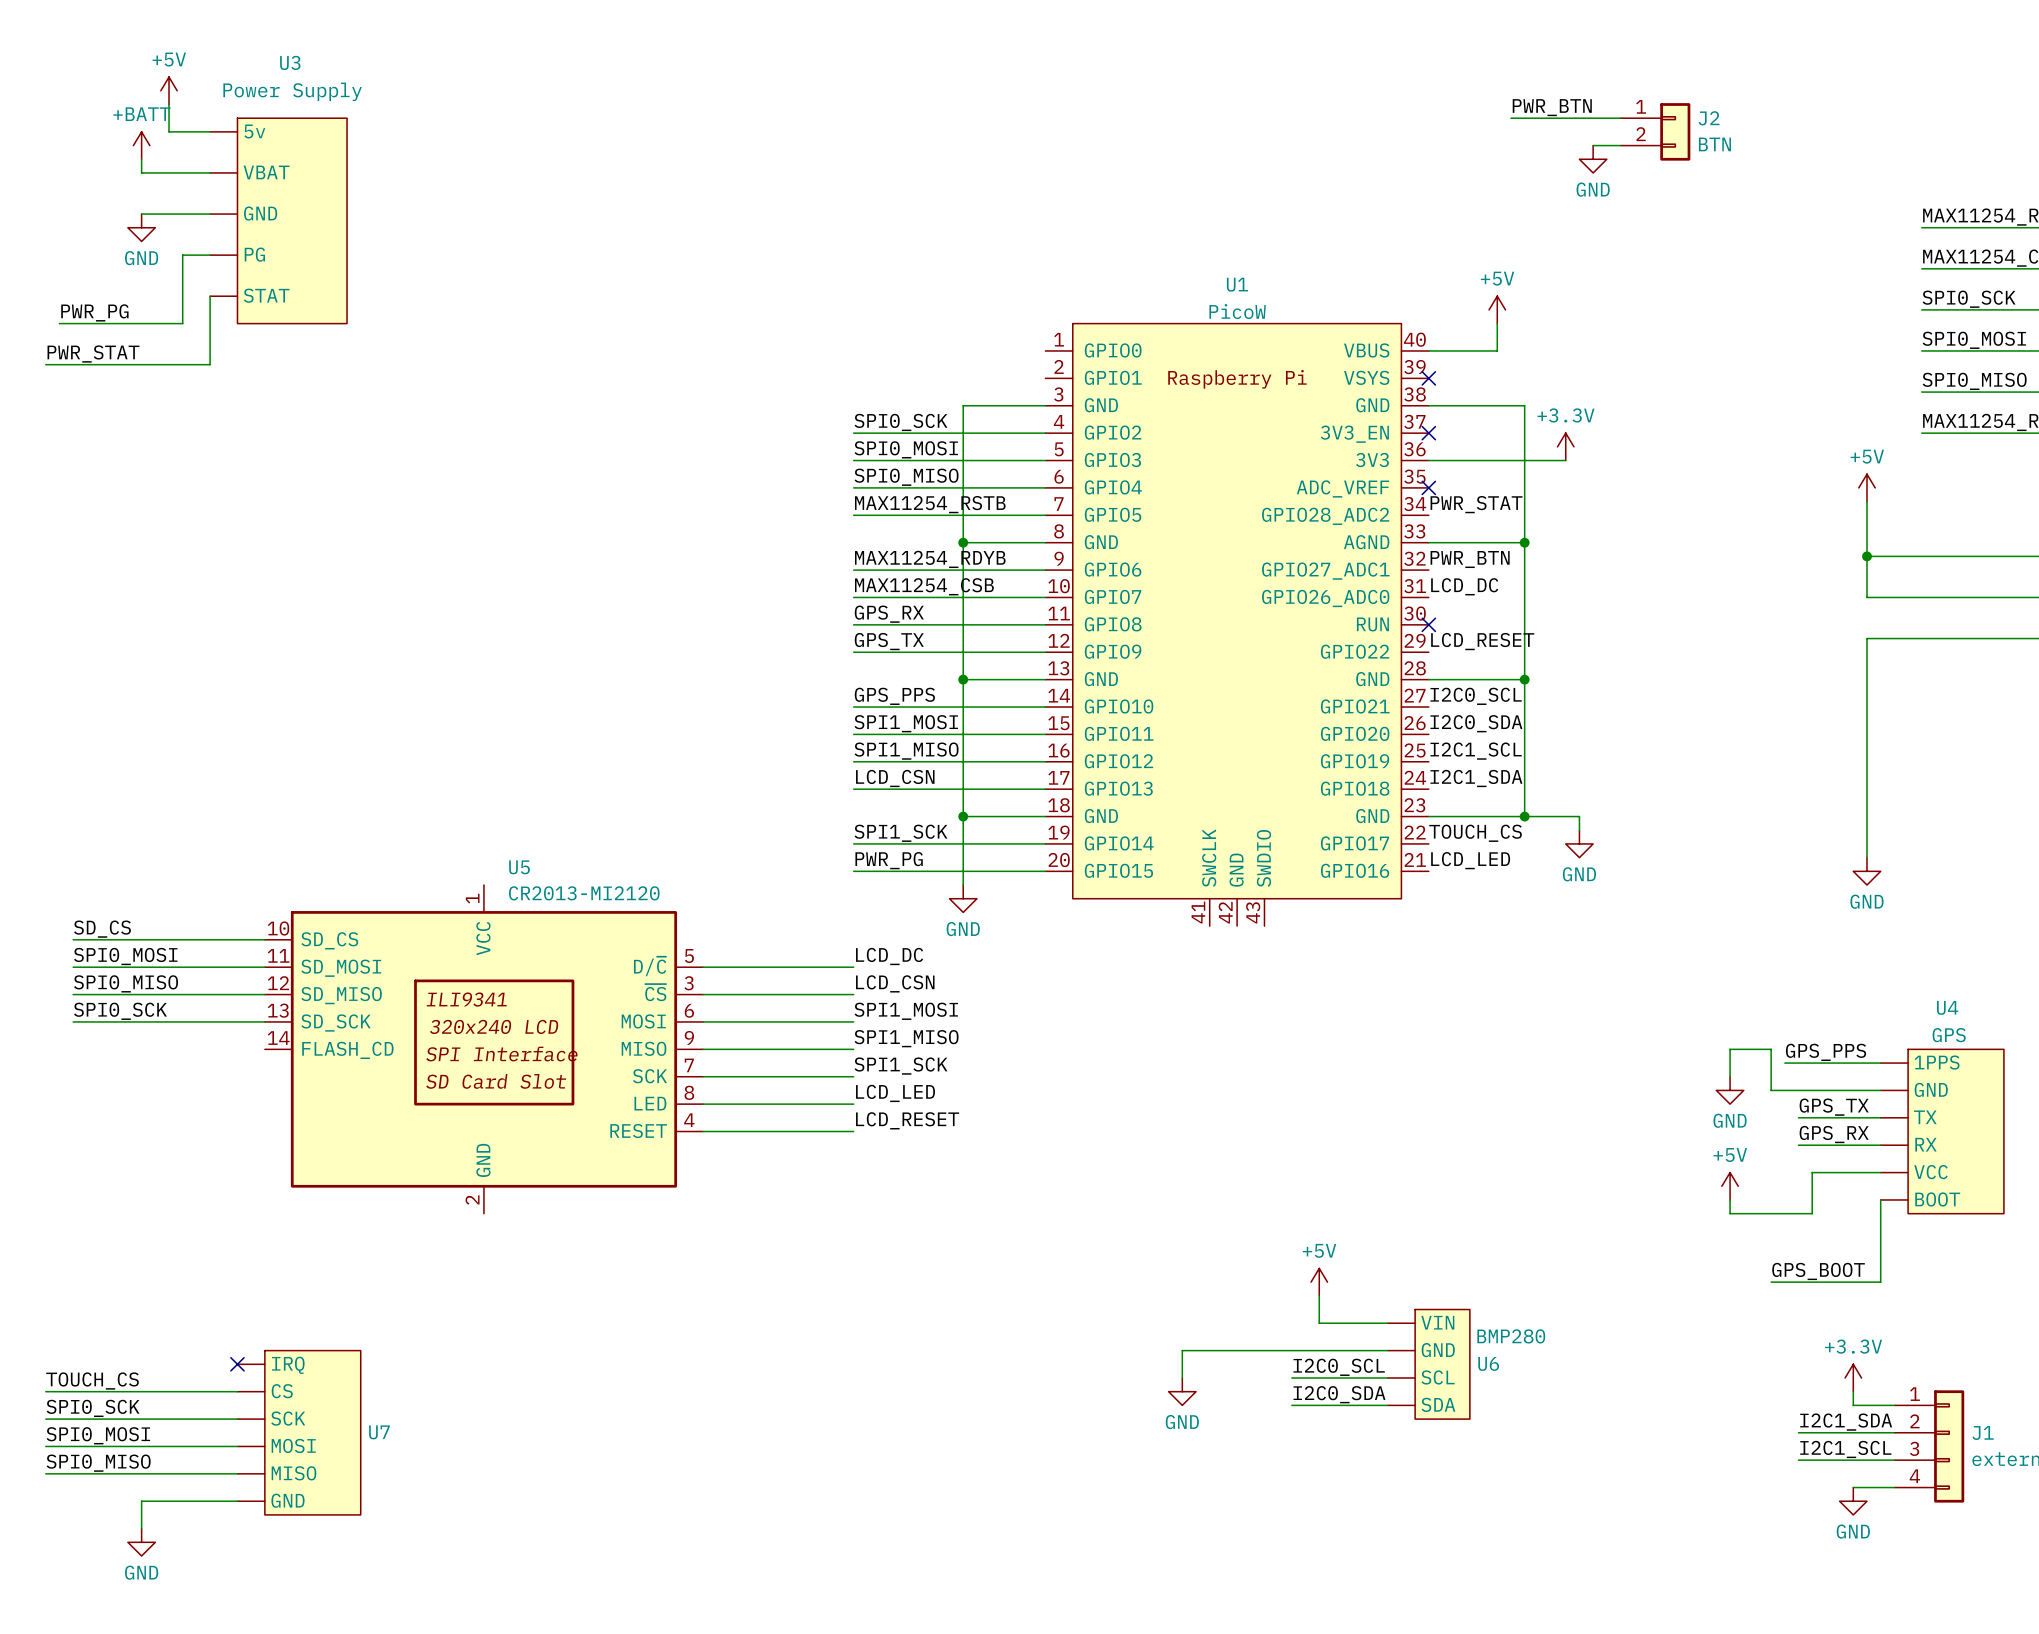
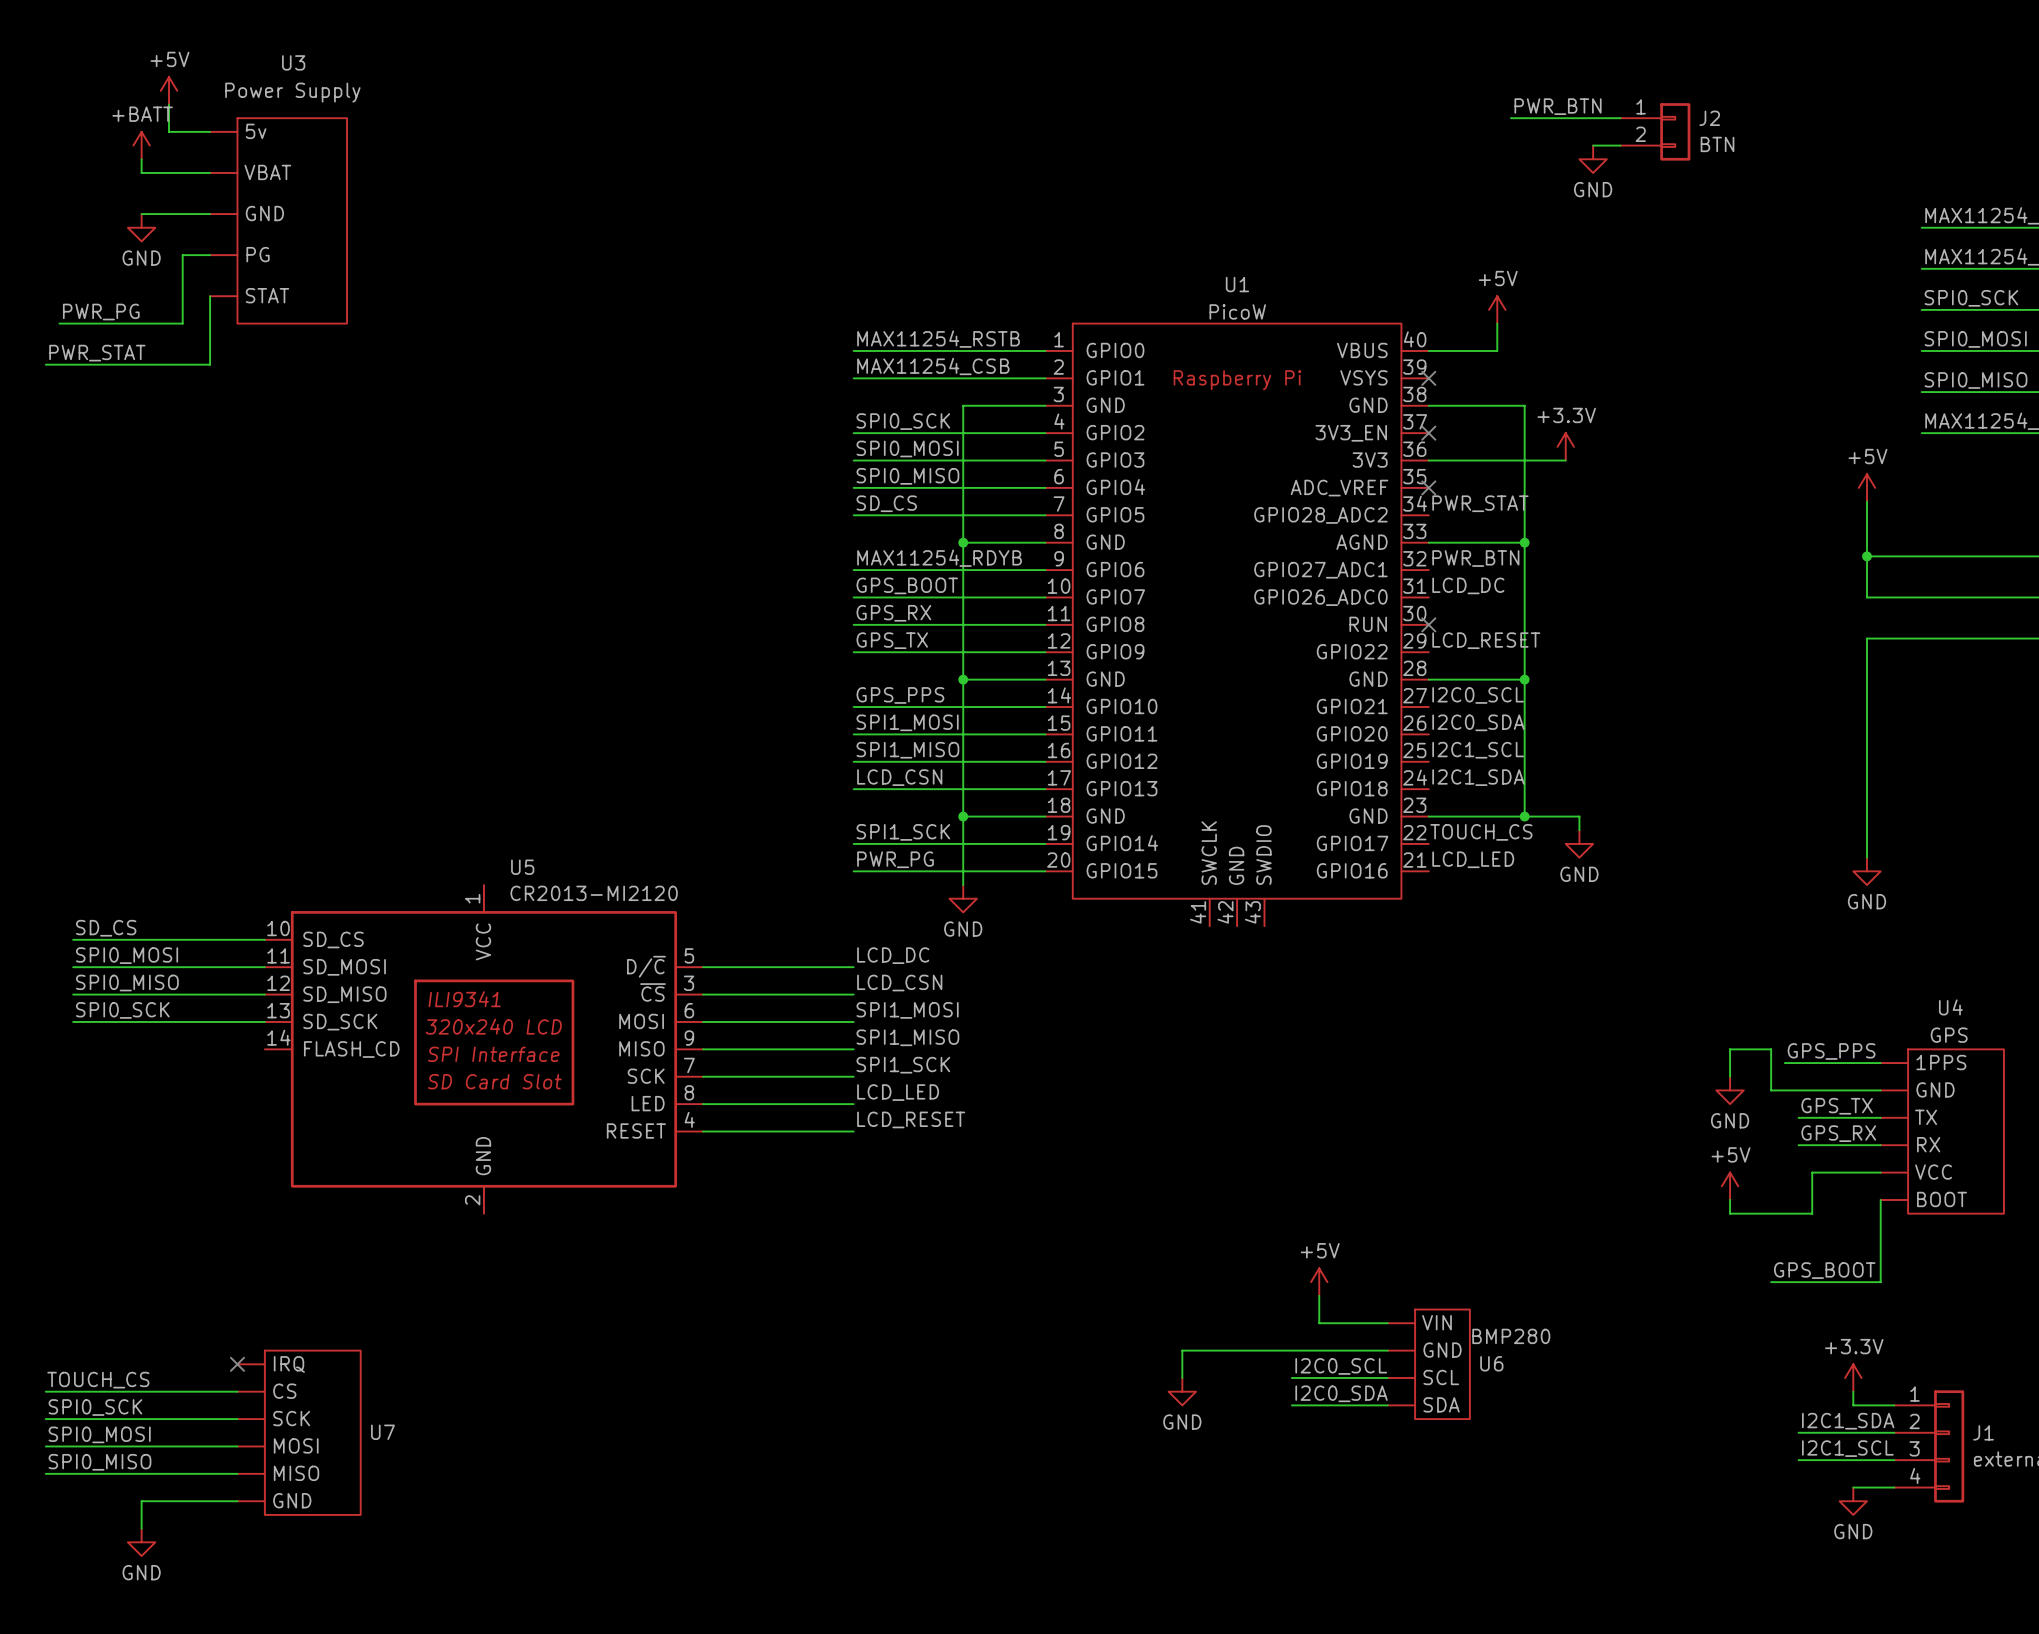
label: none -> MAX11254_RSTB (938, 339)
wire: none -> (853, 350) (1045, 350)
label: none -> MAX11254_CSB (933, 366)
wire: none -> (853, 378) (1045, 378)
label: MAX11254_RSTB (930, 504) -> SD_CS (886, 503)
label: MAX11254_CSB (924, 586) -> GPS_BOOT (907, 585)

